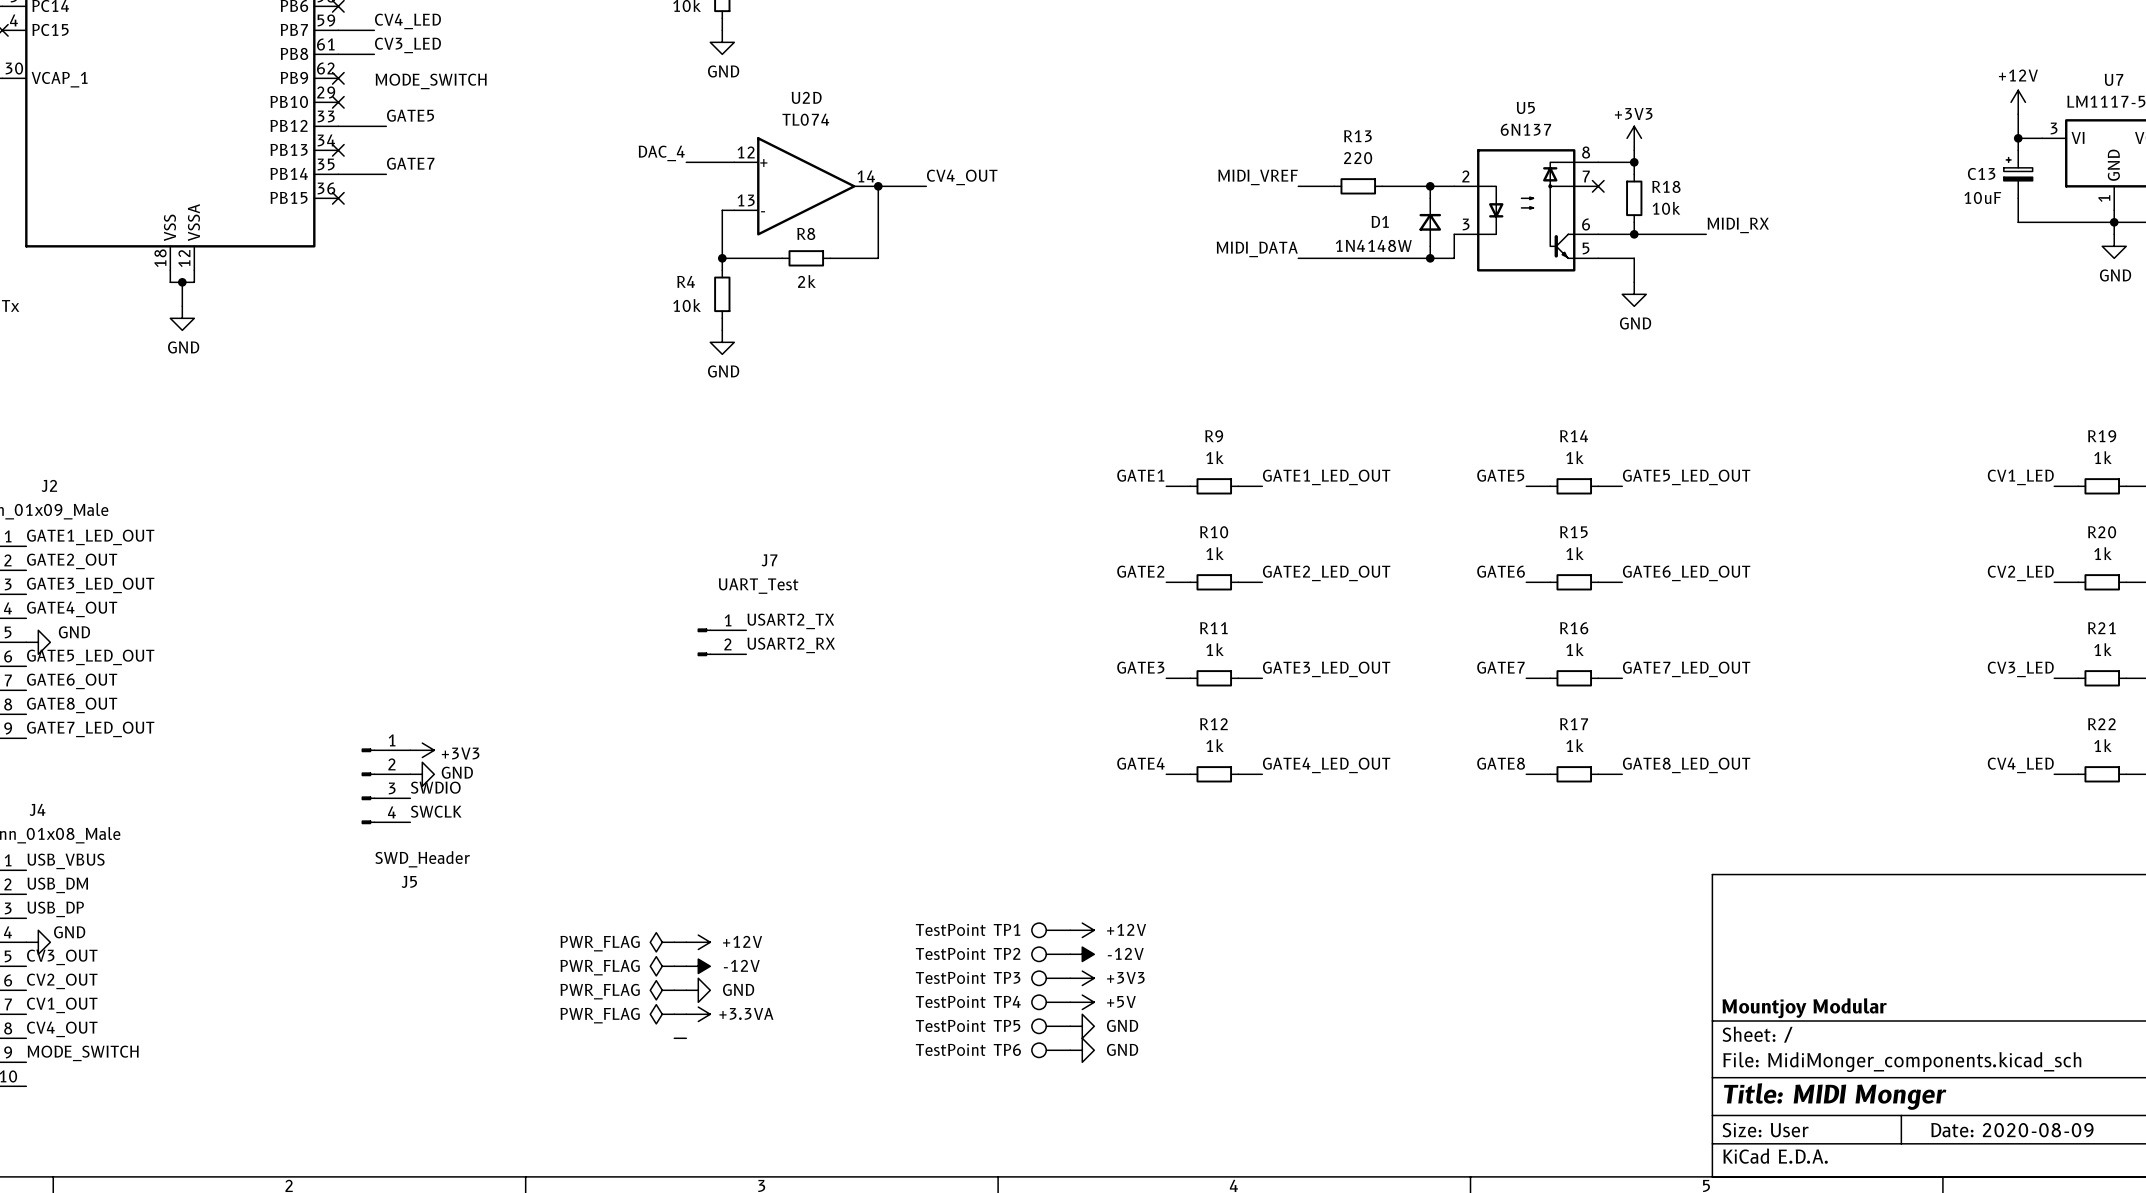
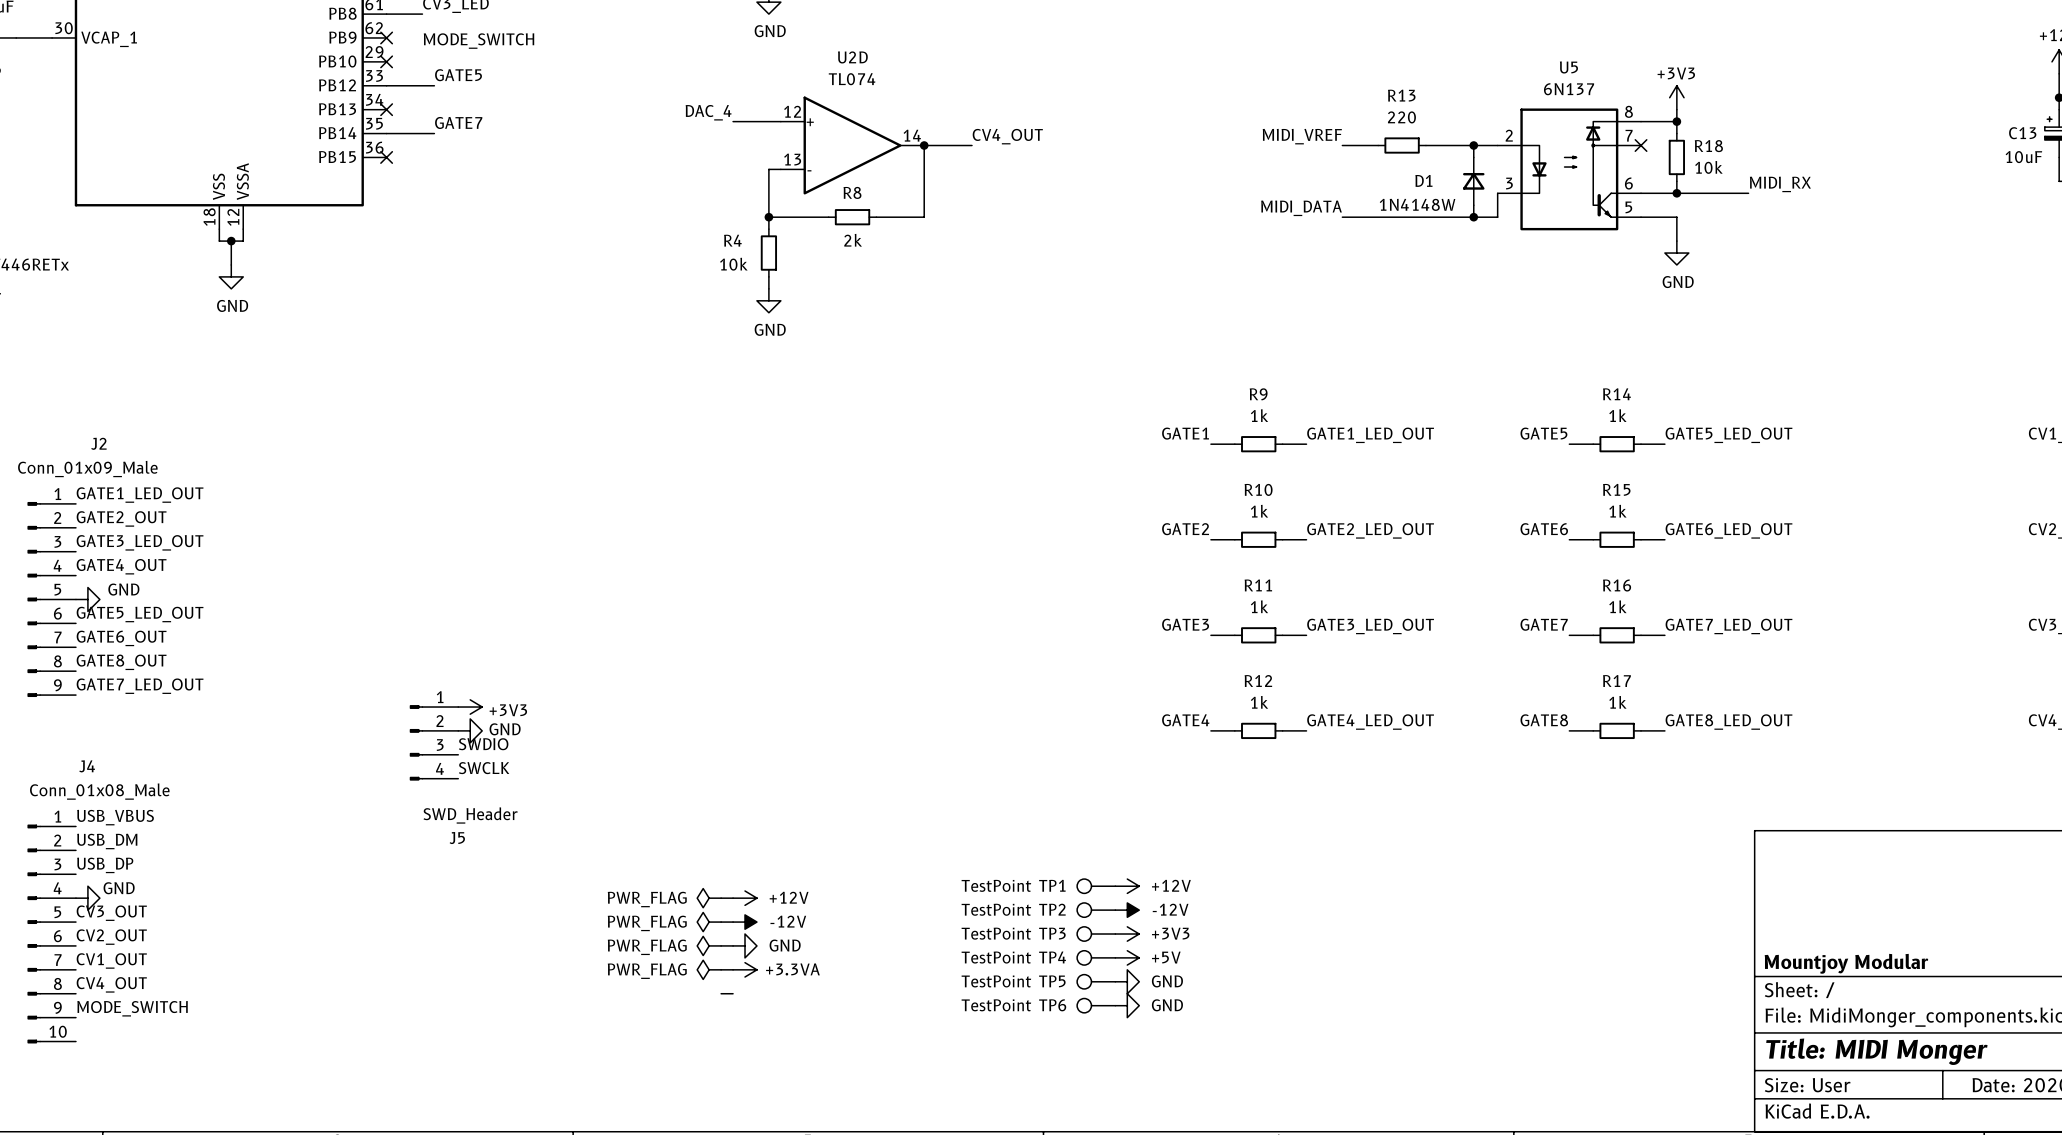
label: USART2_TX (790, 621) -> none
J7: UART_Test (721, 642) -> none
label: USART2_RX (791, 645) -> none

